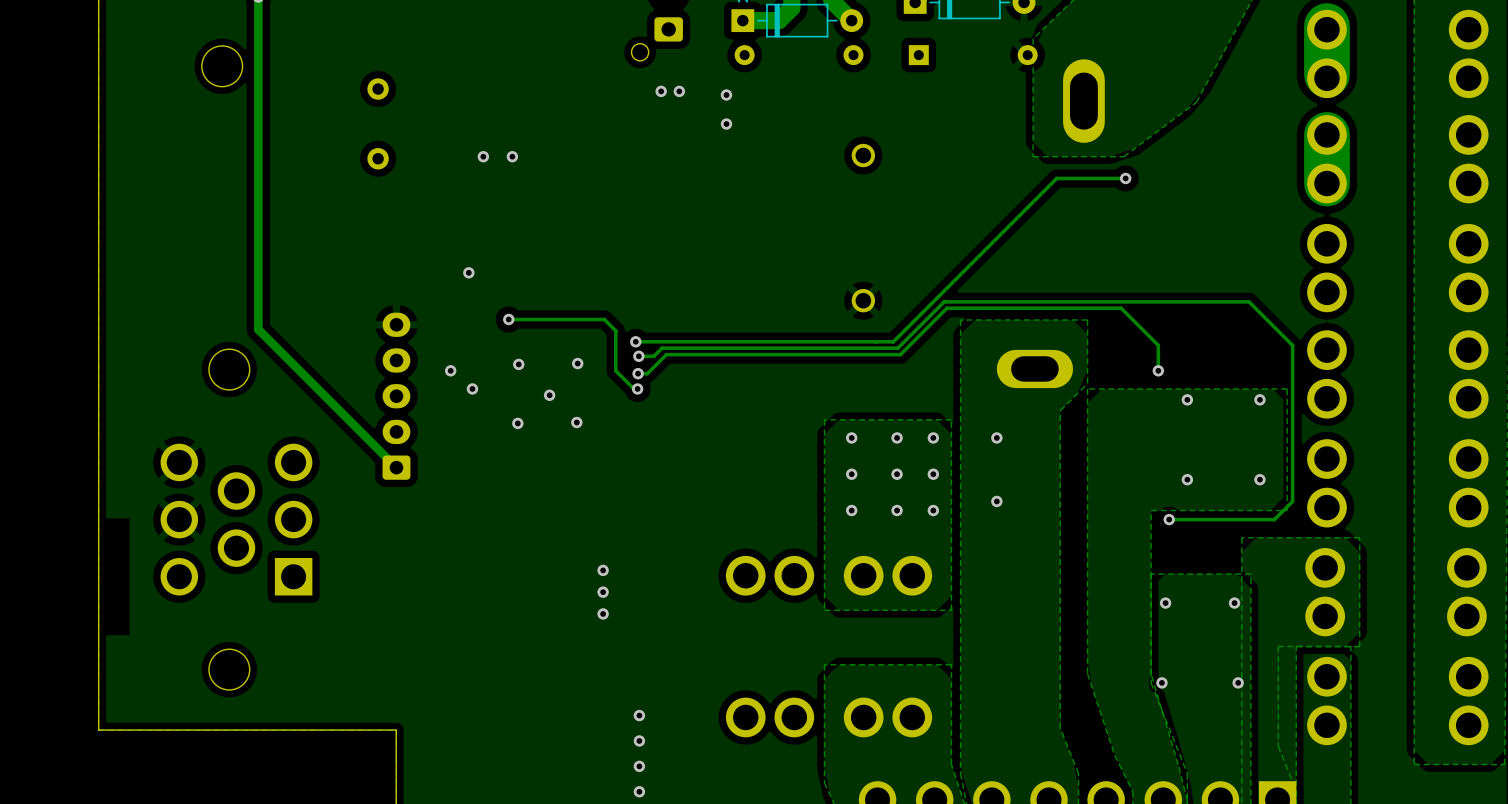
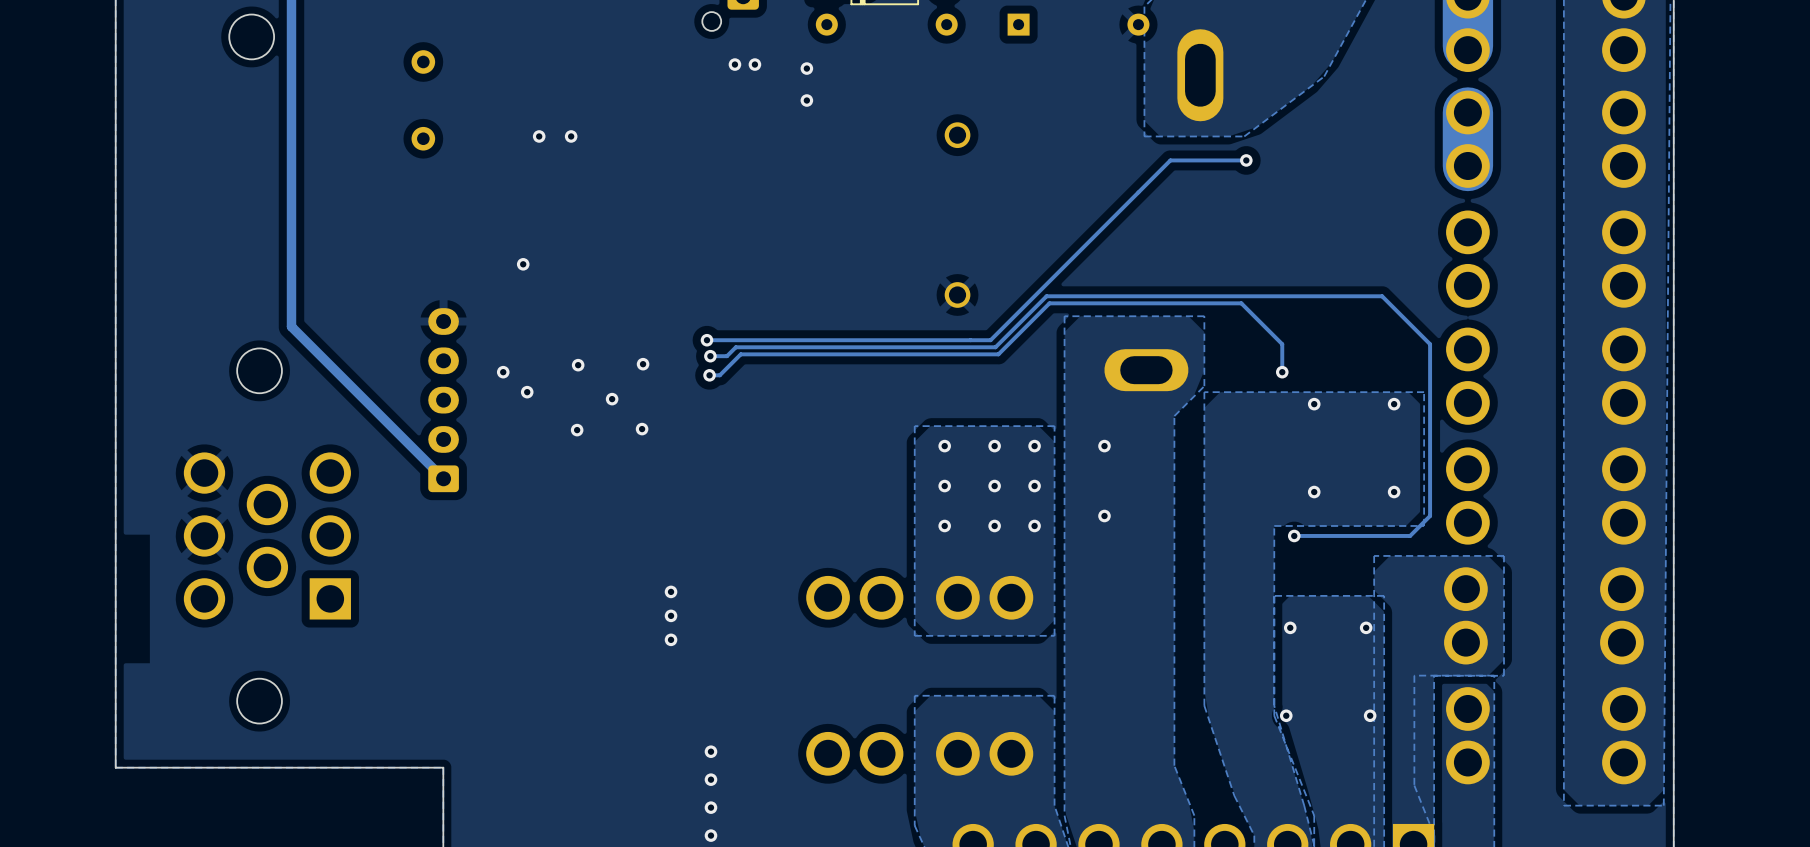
track: (508, 319) (604, 319) (615, 330) (615, 370) (633, 388) (637, 388) -> none
via: (508, 319) -> none
via: (637, 388) -> none

